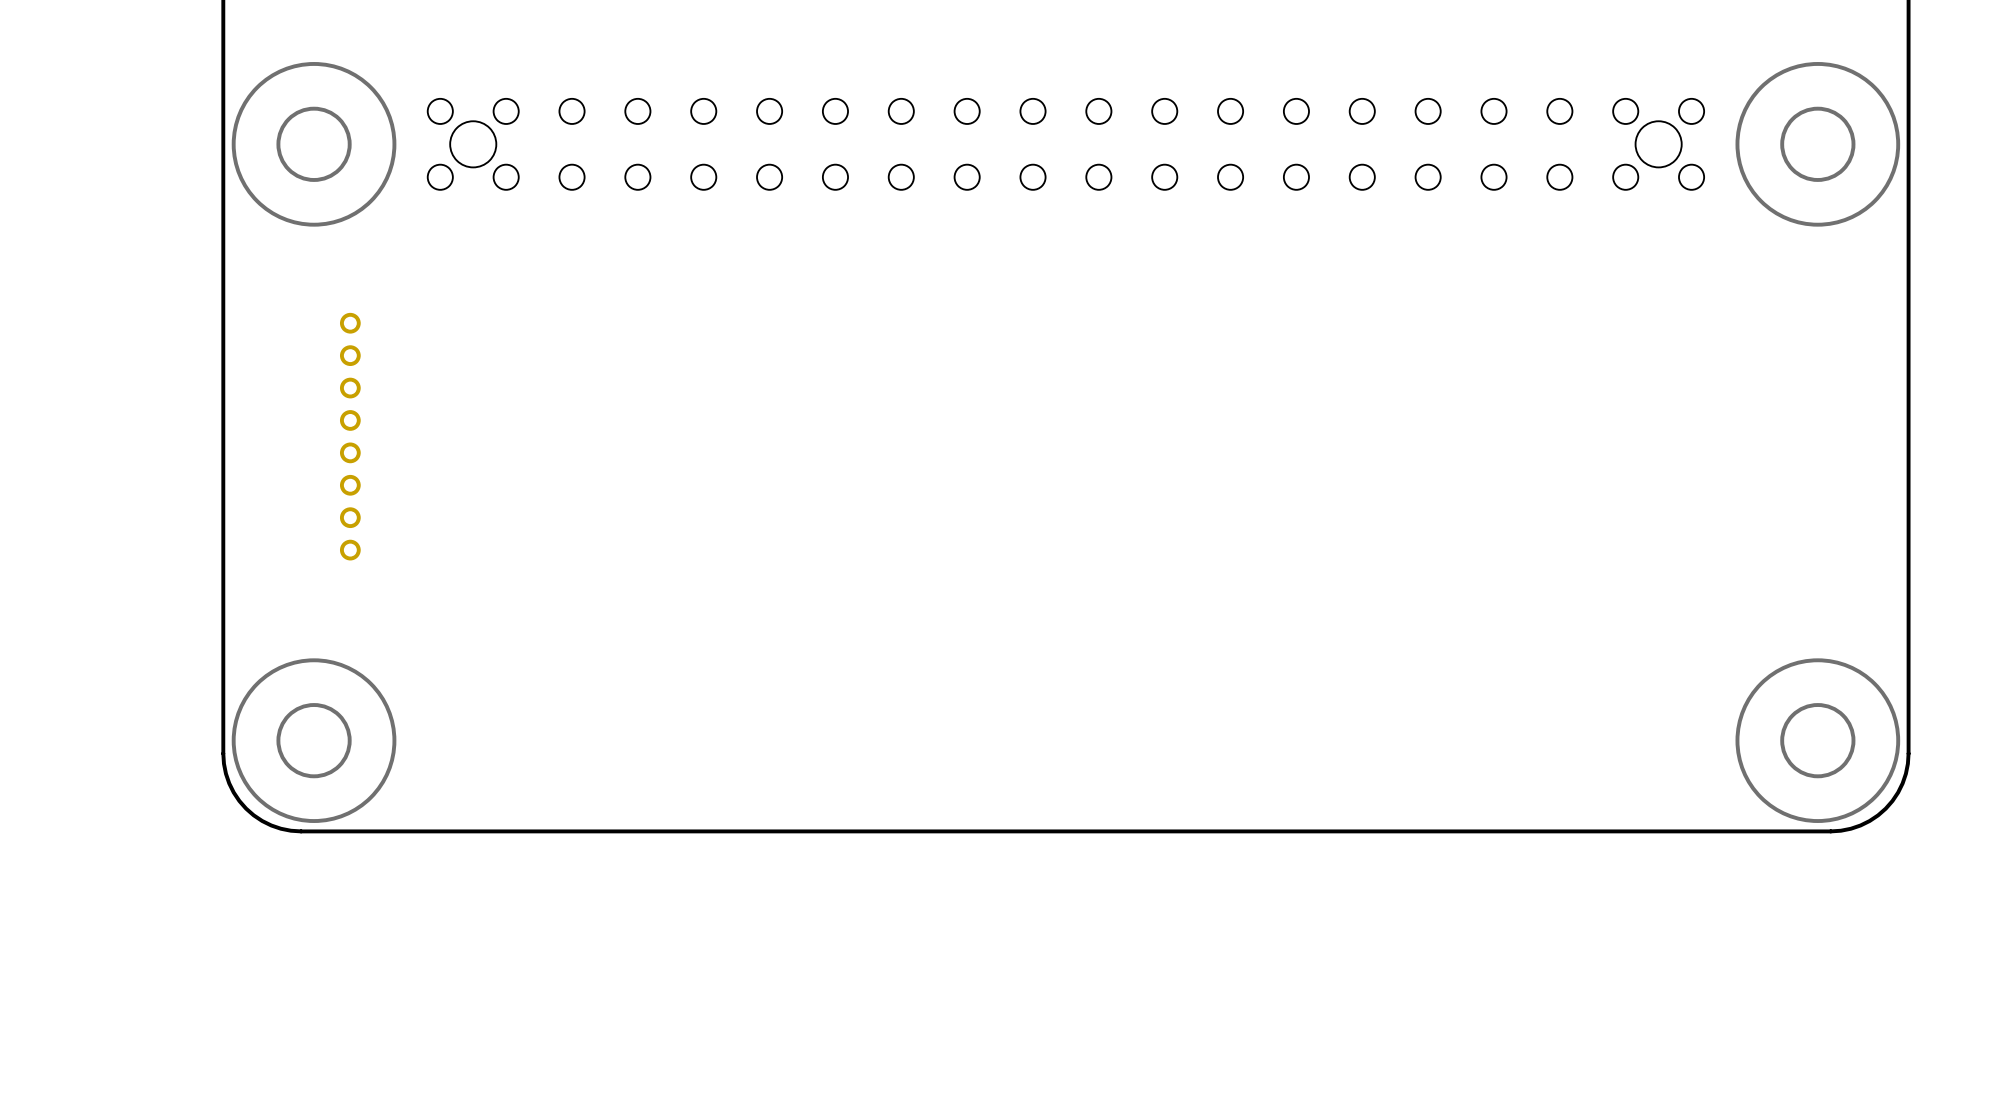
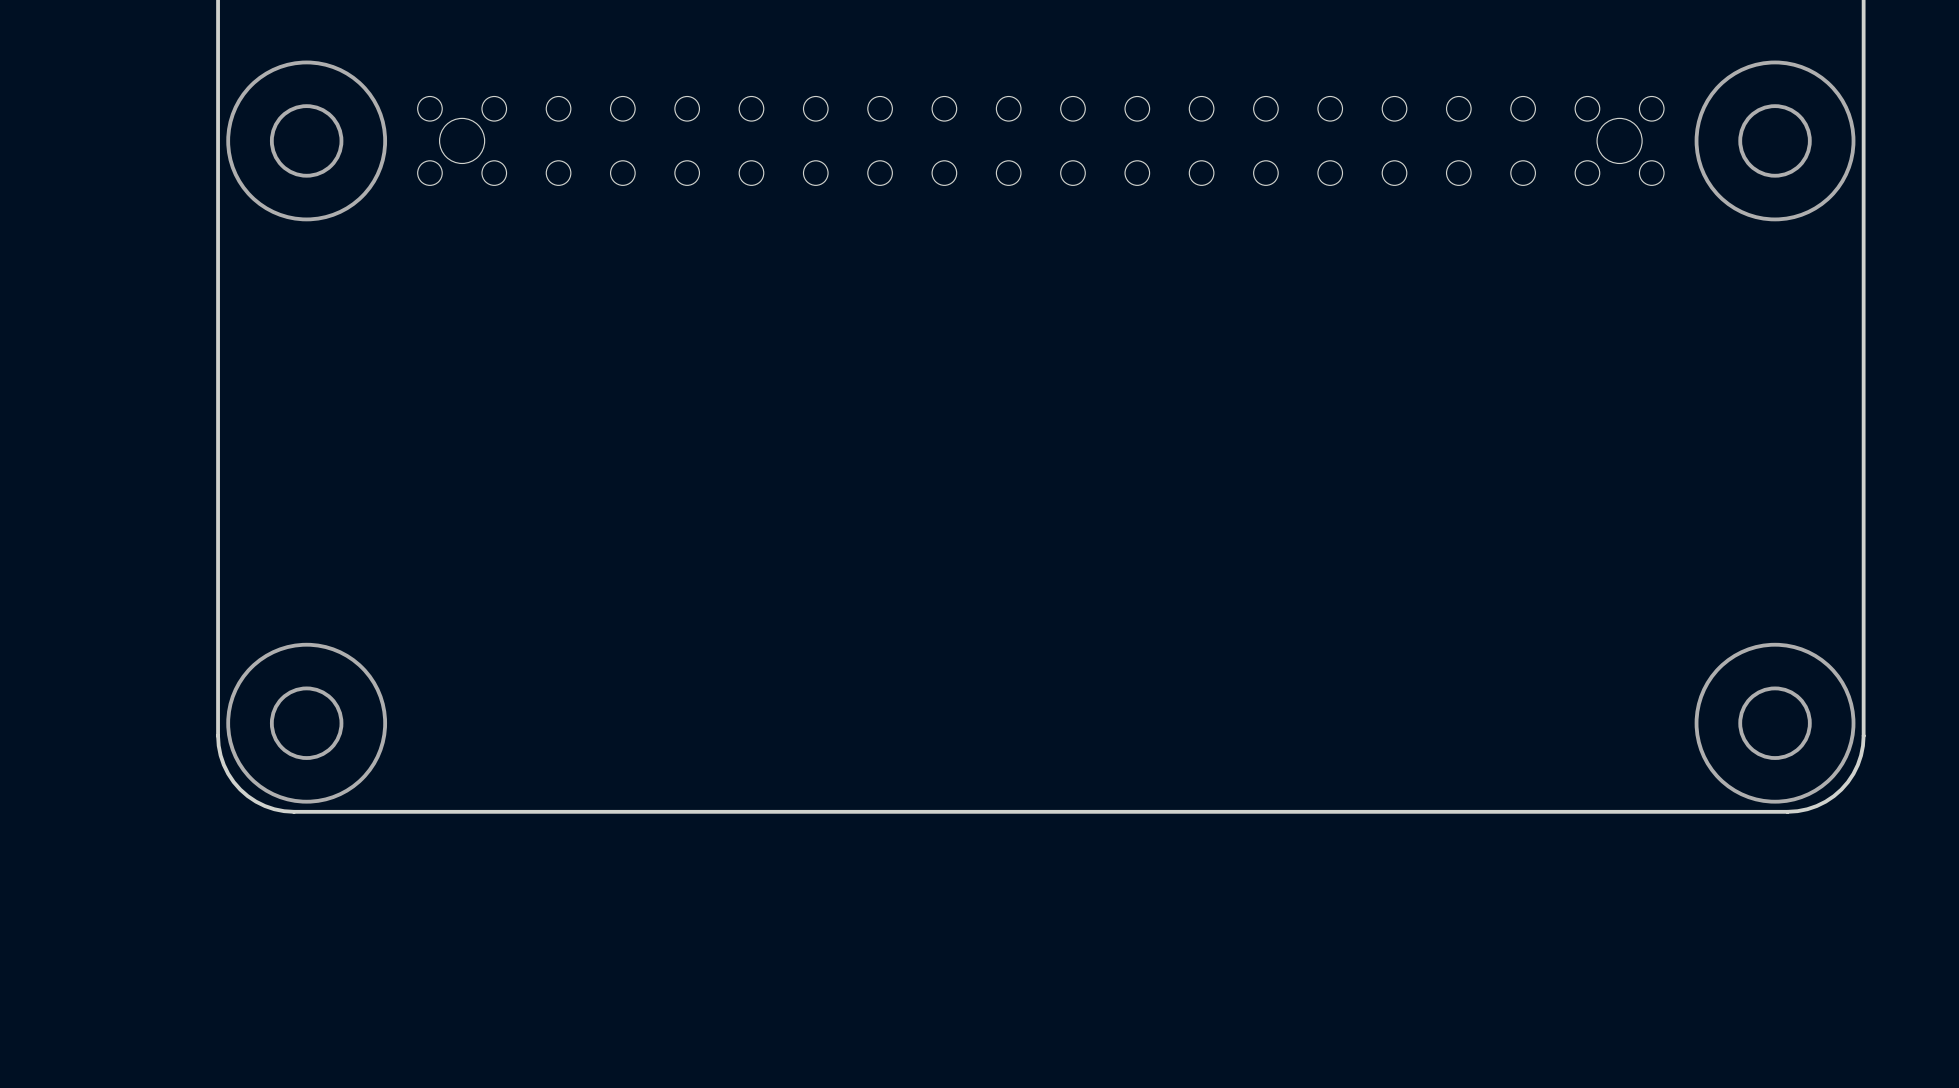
part: (350, 436) -> none

